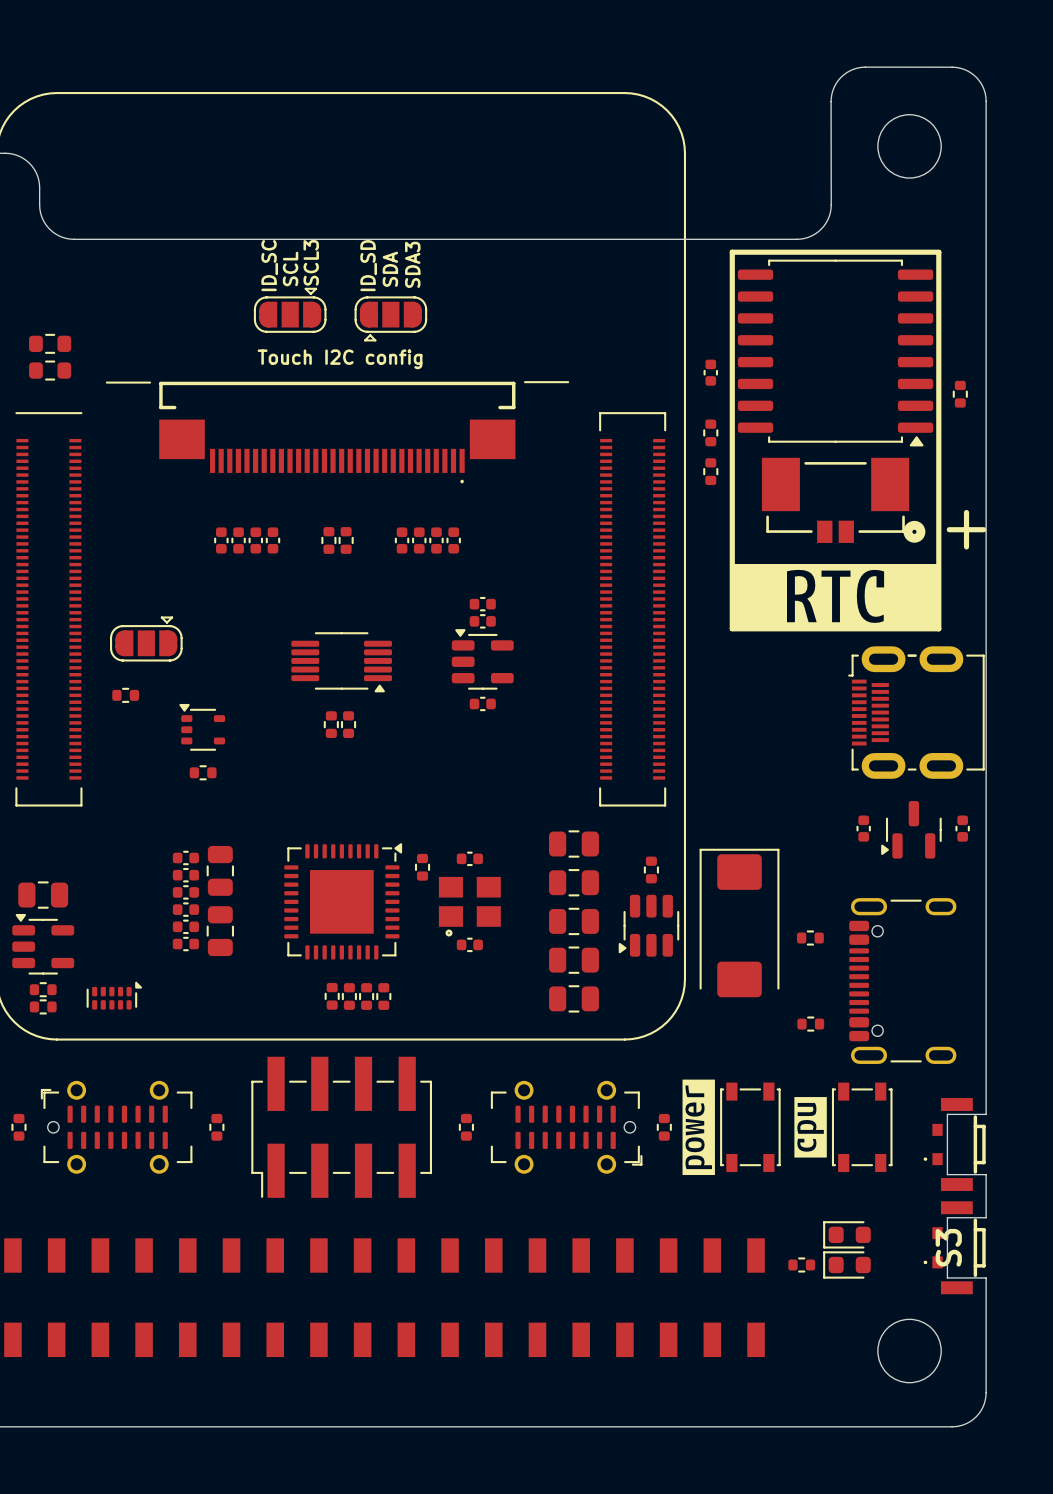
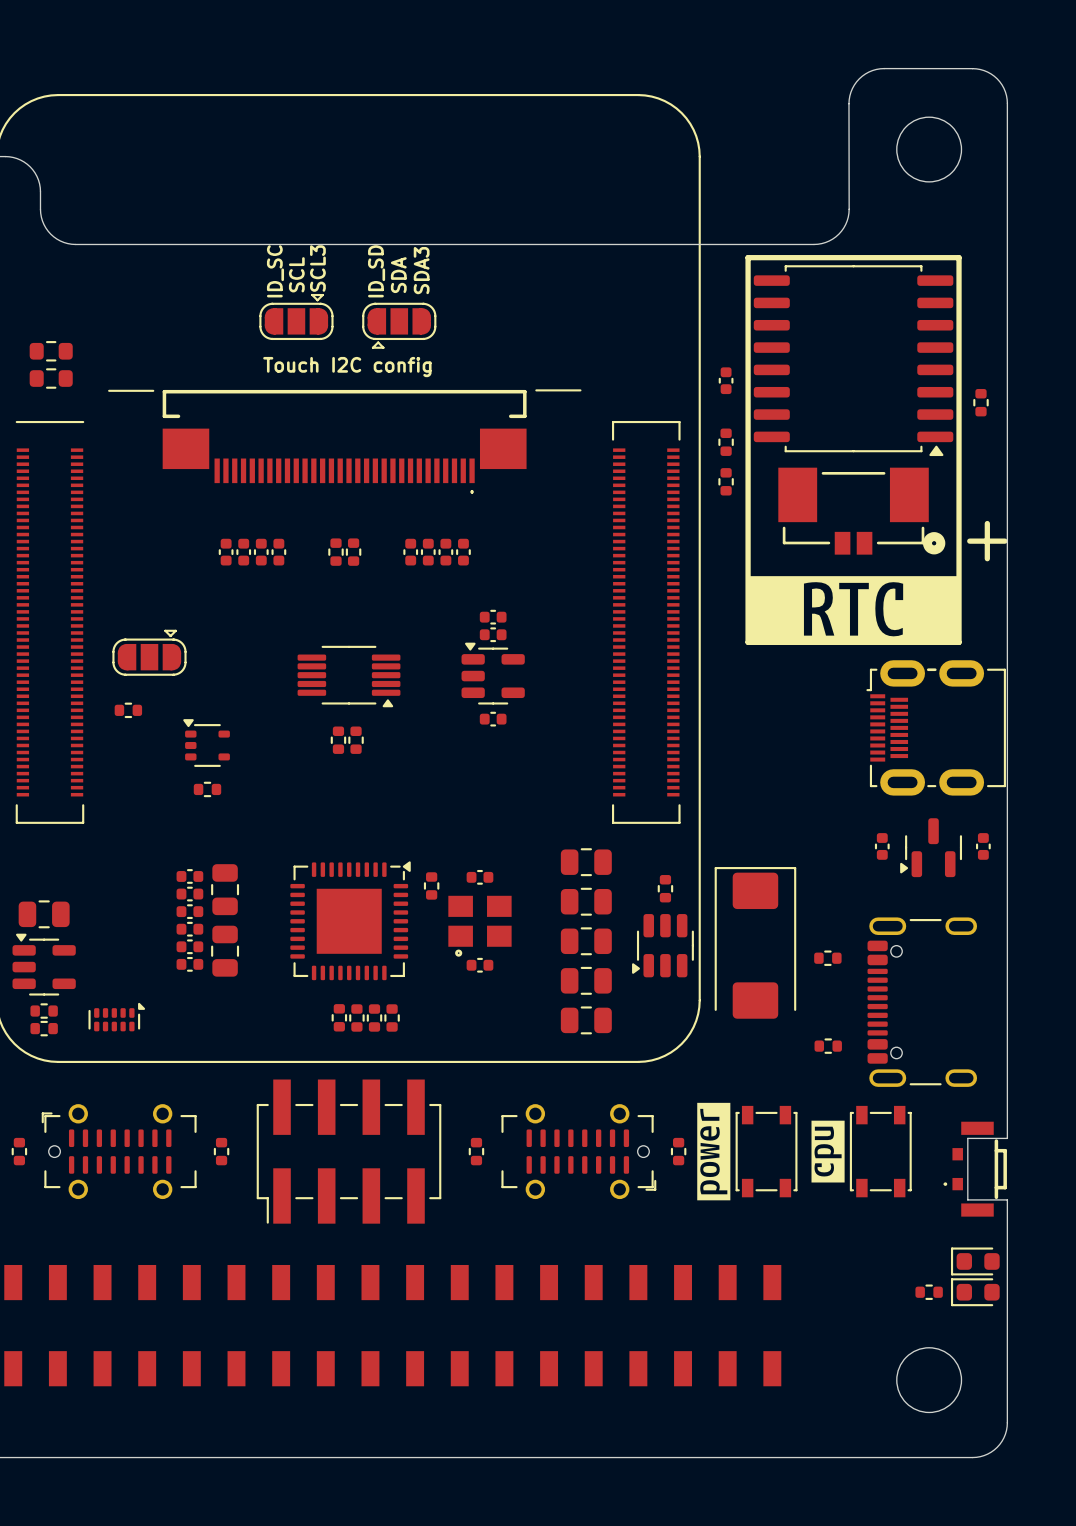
board edge: (986, 1174) (986, 1217) (947, 1217) (947, 1277) (986, 1277) (986, 1392) -> (1007, 1199) (1007, 1422)
part: (846, 1234) -> none
part: none -> (975, 1261)
S3: (954, 1247) -> none
part position: (801, 1264) -> (929, 1292)
part: (846, 1264) -> none
part: none -> (975, 1292)

